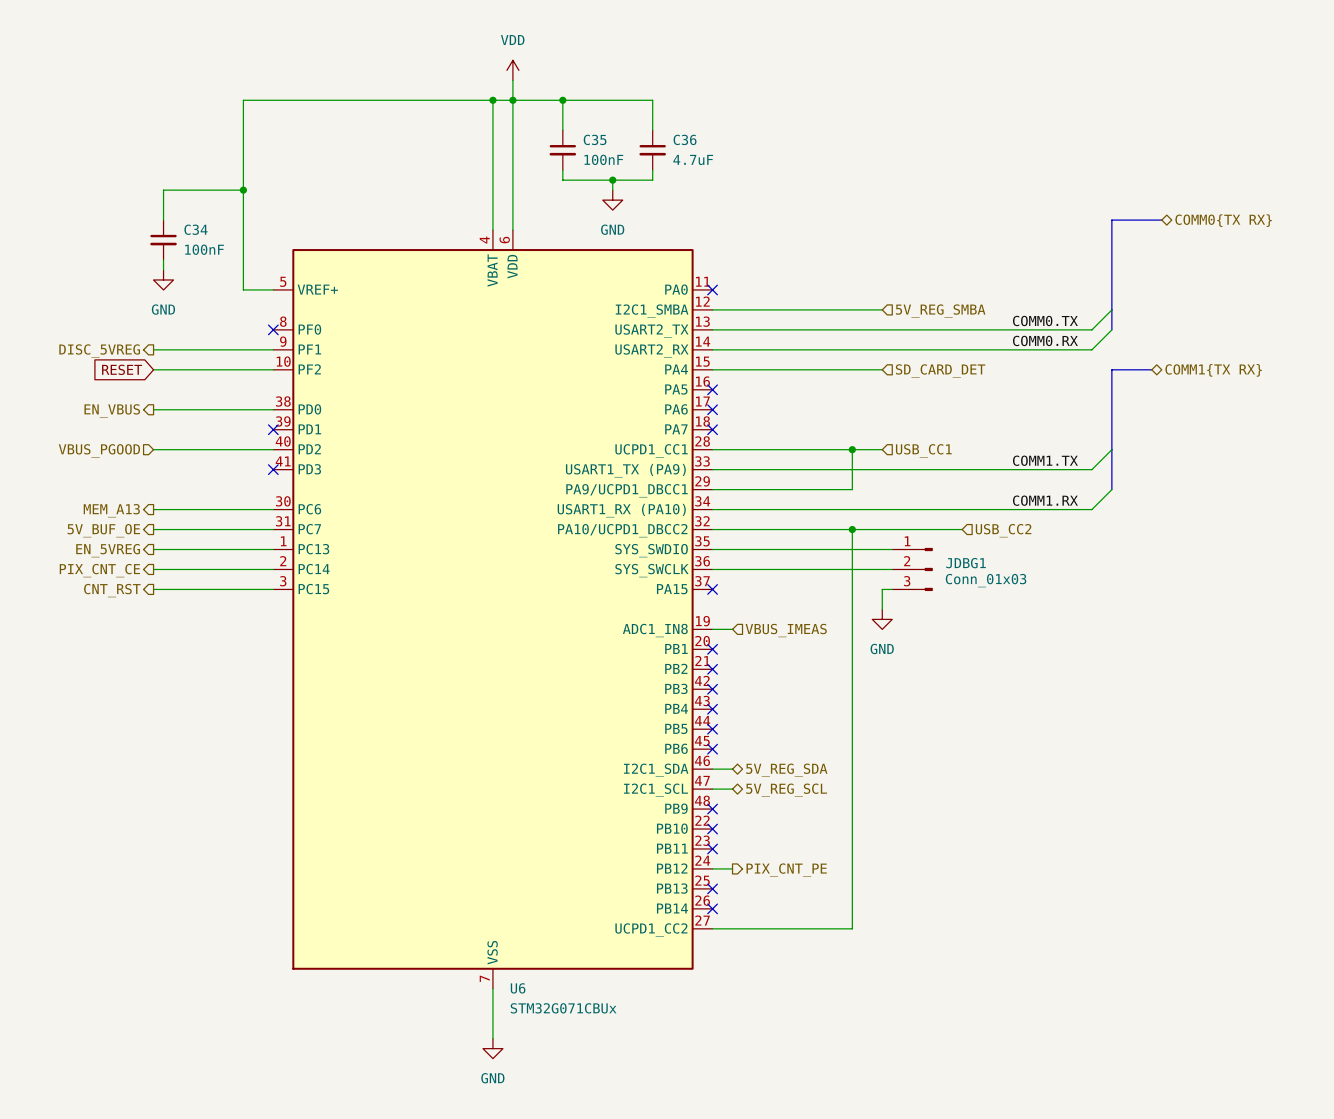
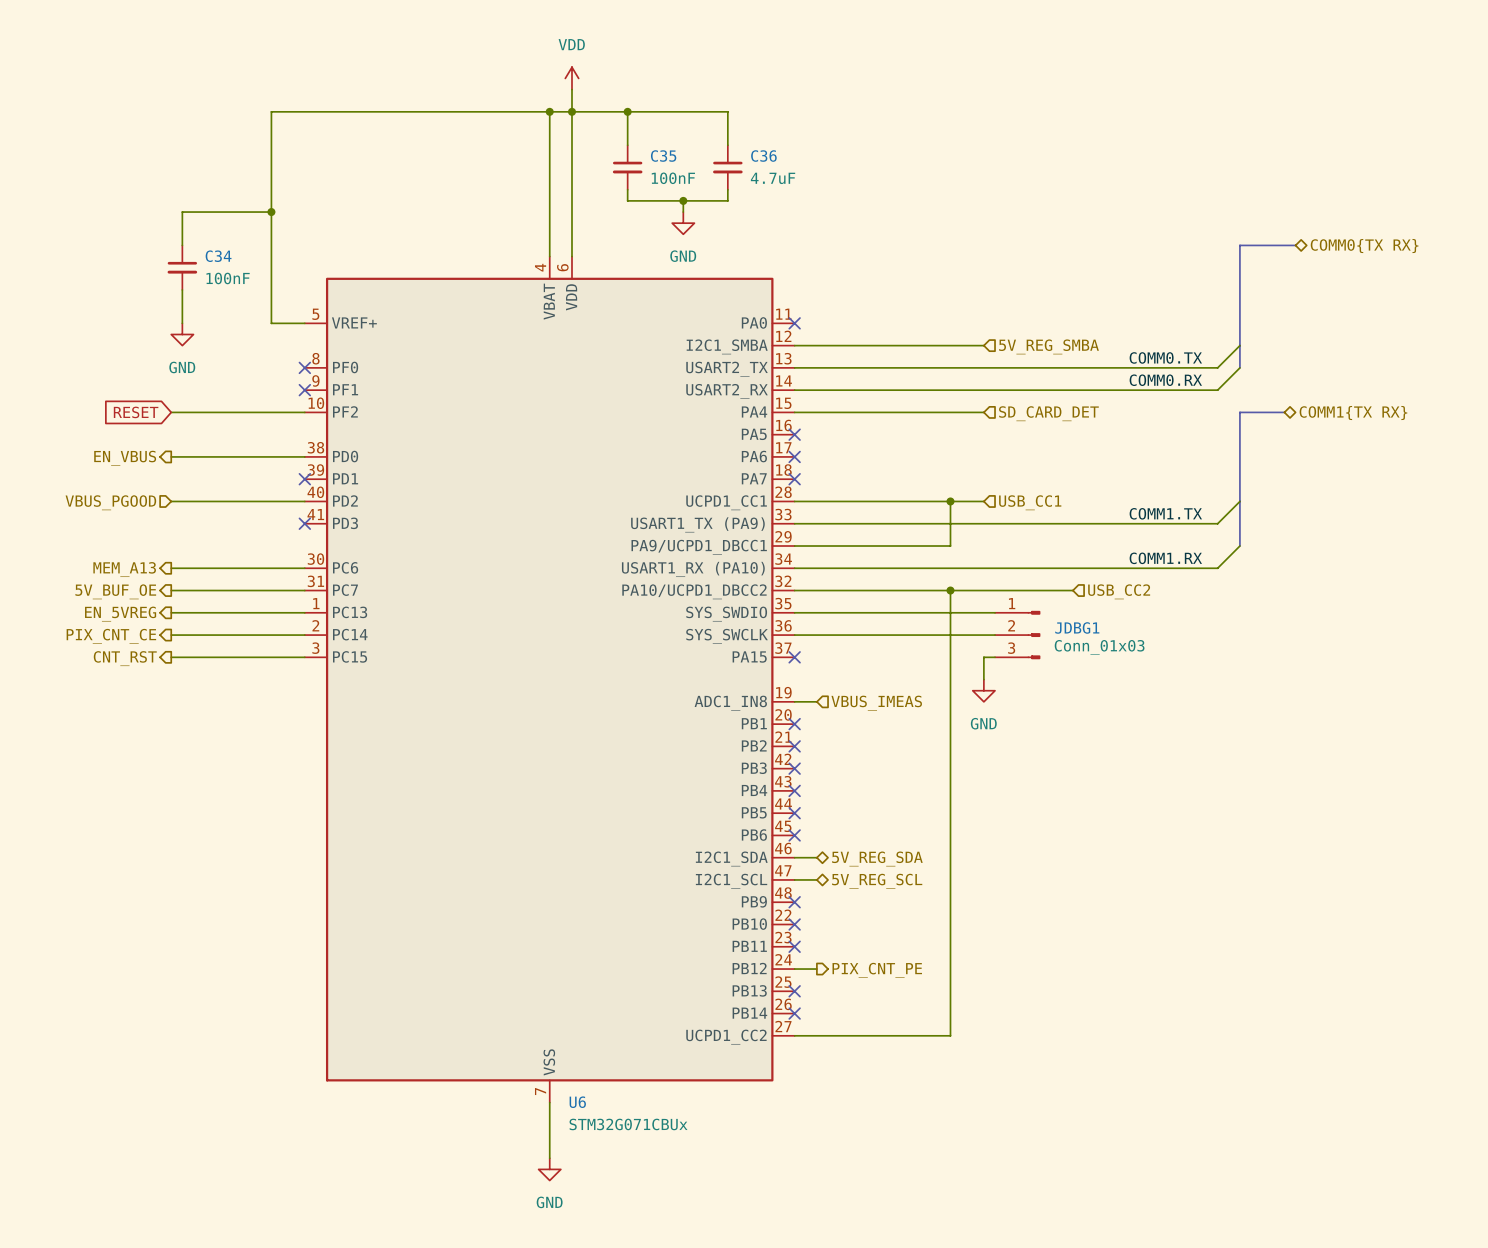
power symbol position: GND (163, 279) -> GND (182, 334)
wire: (153, 349) (273, 349) -> none
no-connect mark: none -> (304, 390)
hierarchical label: DISC_5VREG (99, 351) -> none

